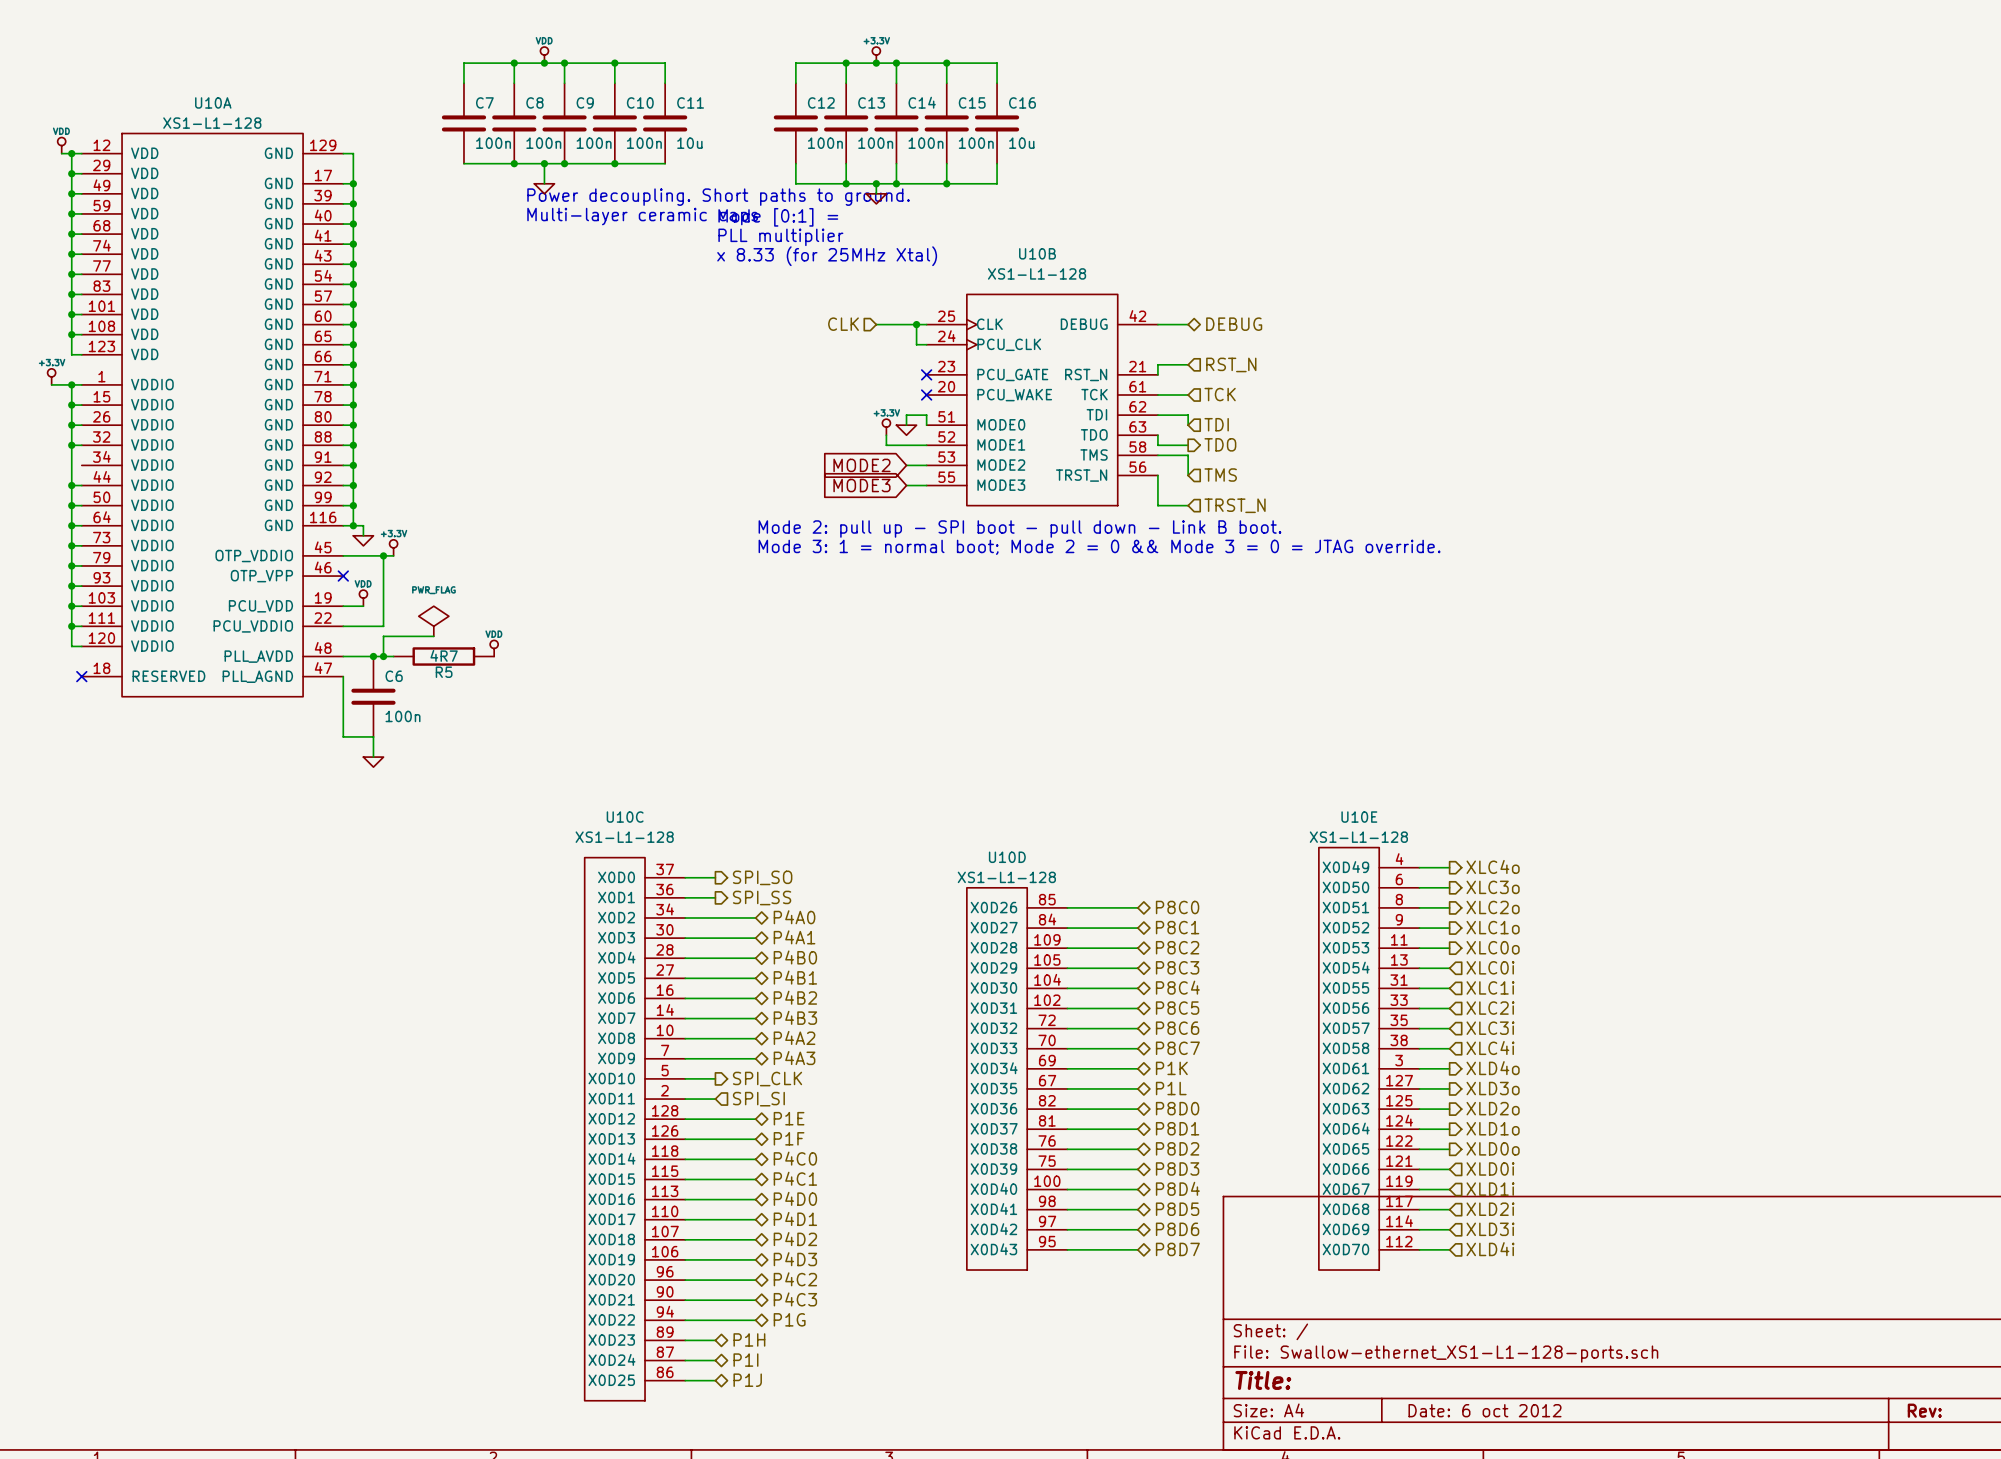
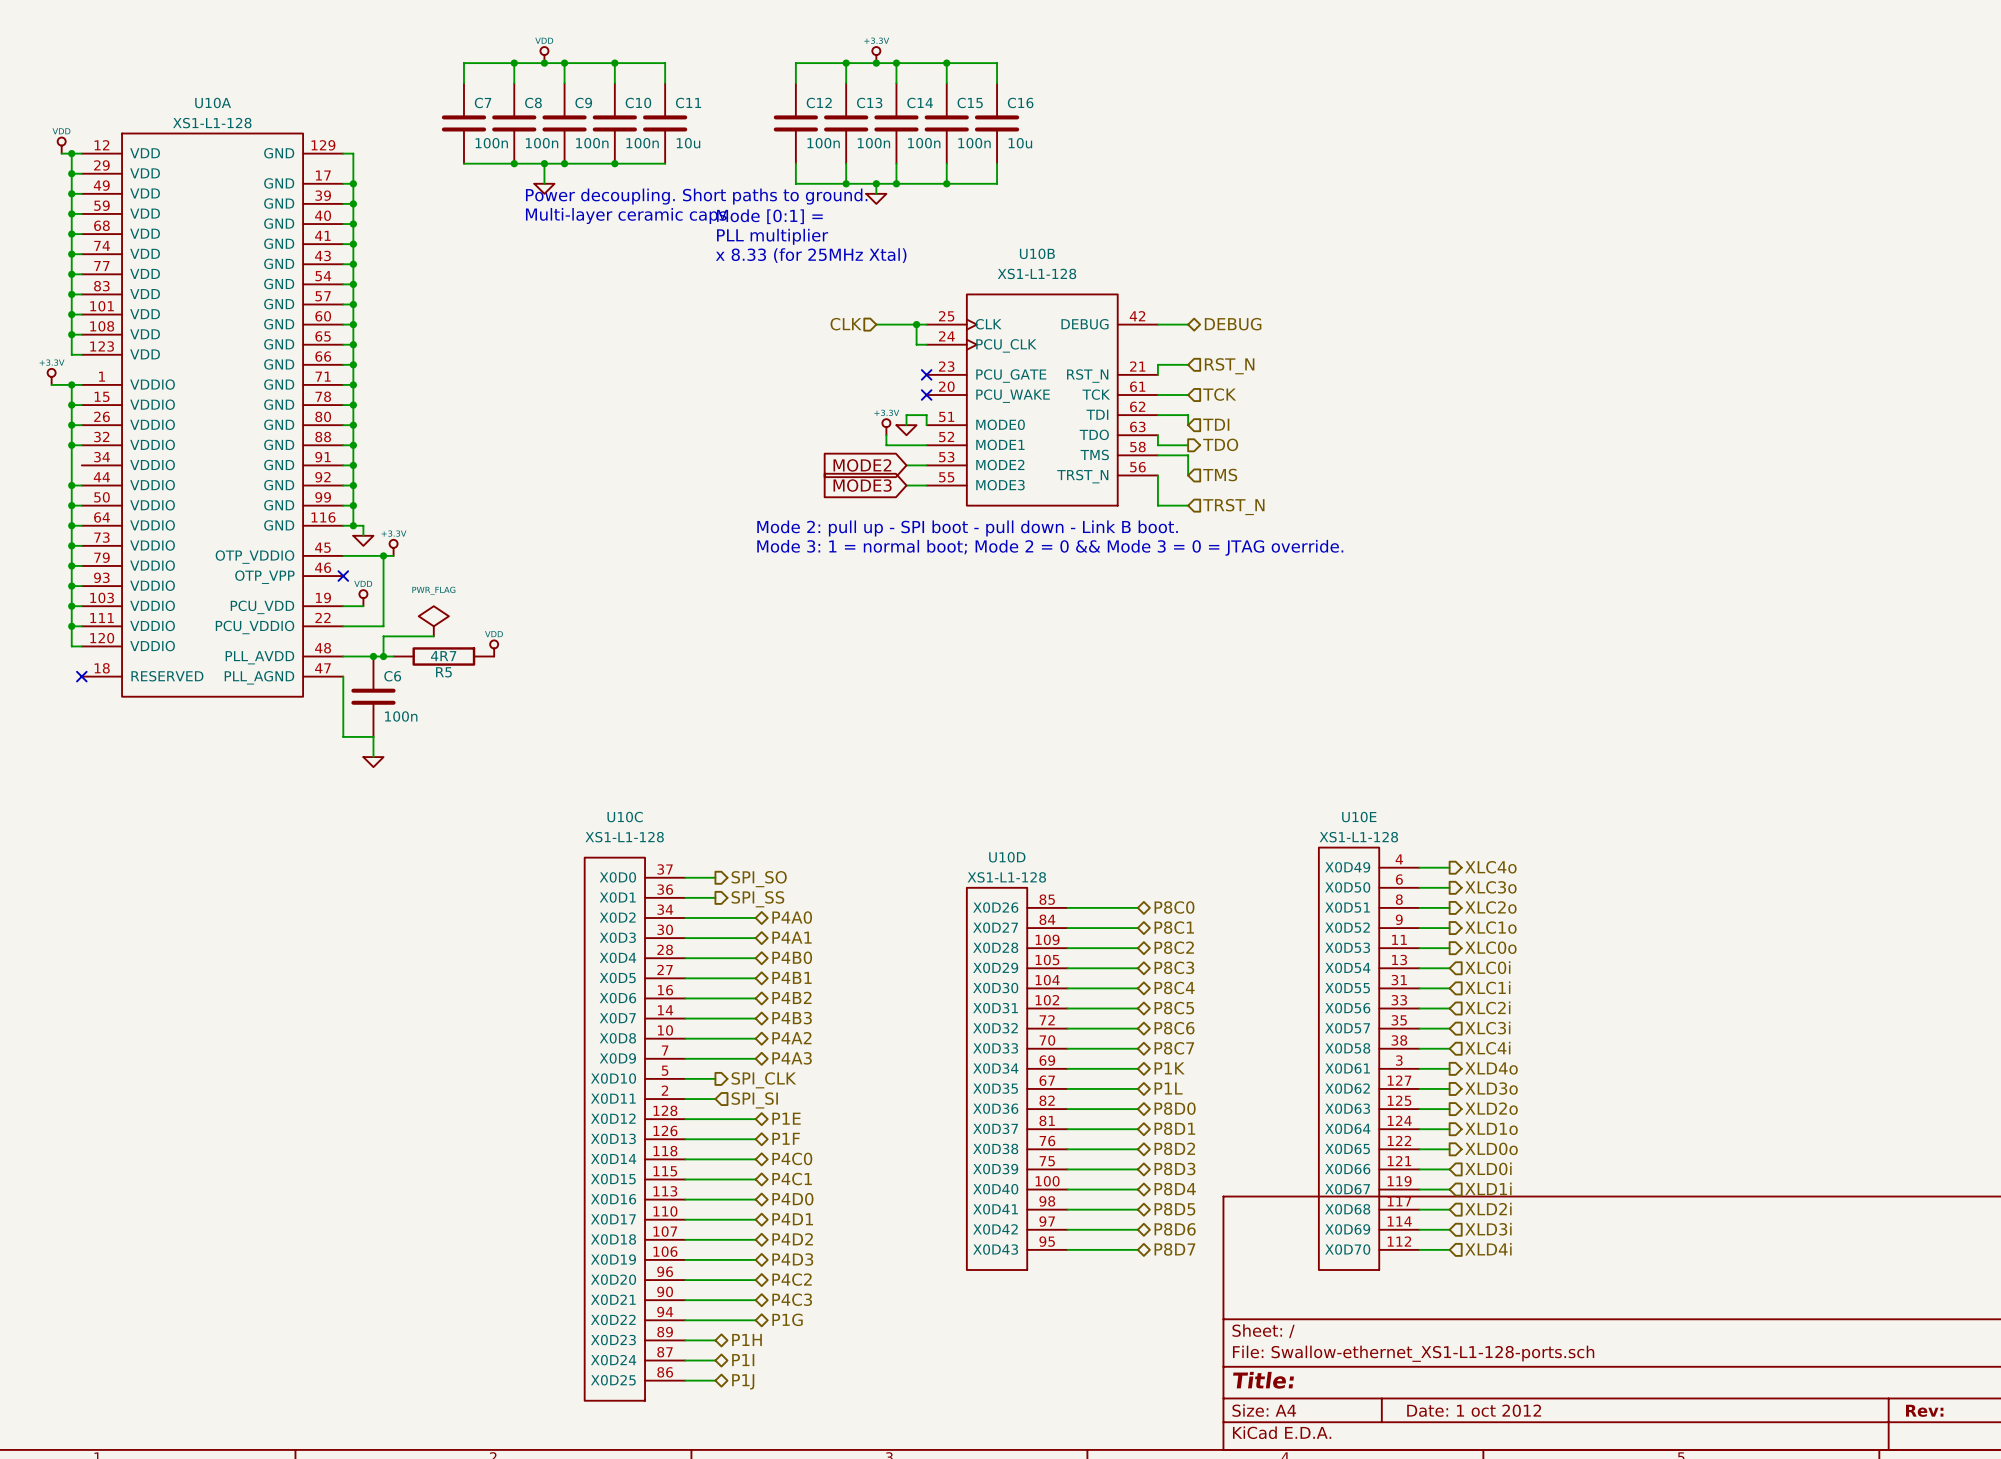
title block: Date: 6 oct 2012 (1485, 1410) -> Date: 1 oct 2012 (1474, 1410)

